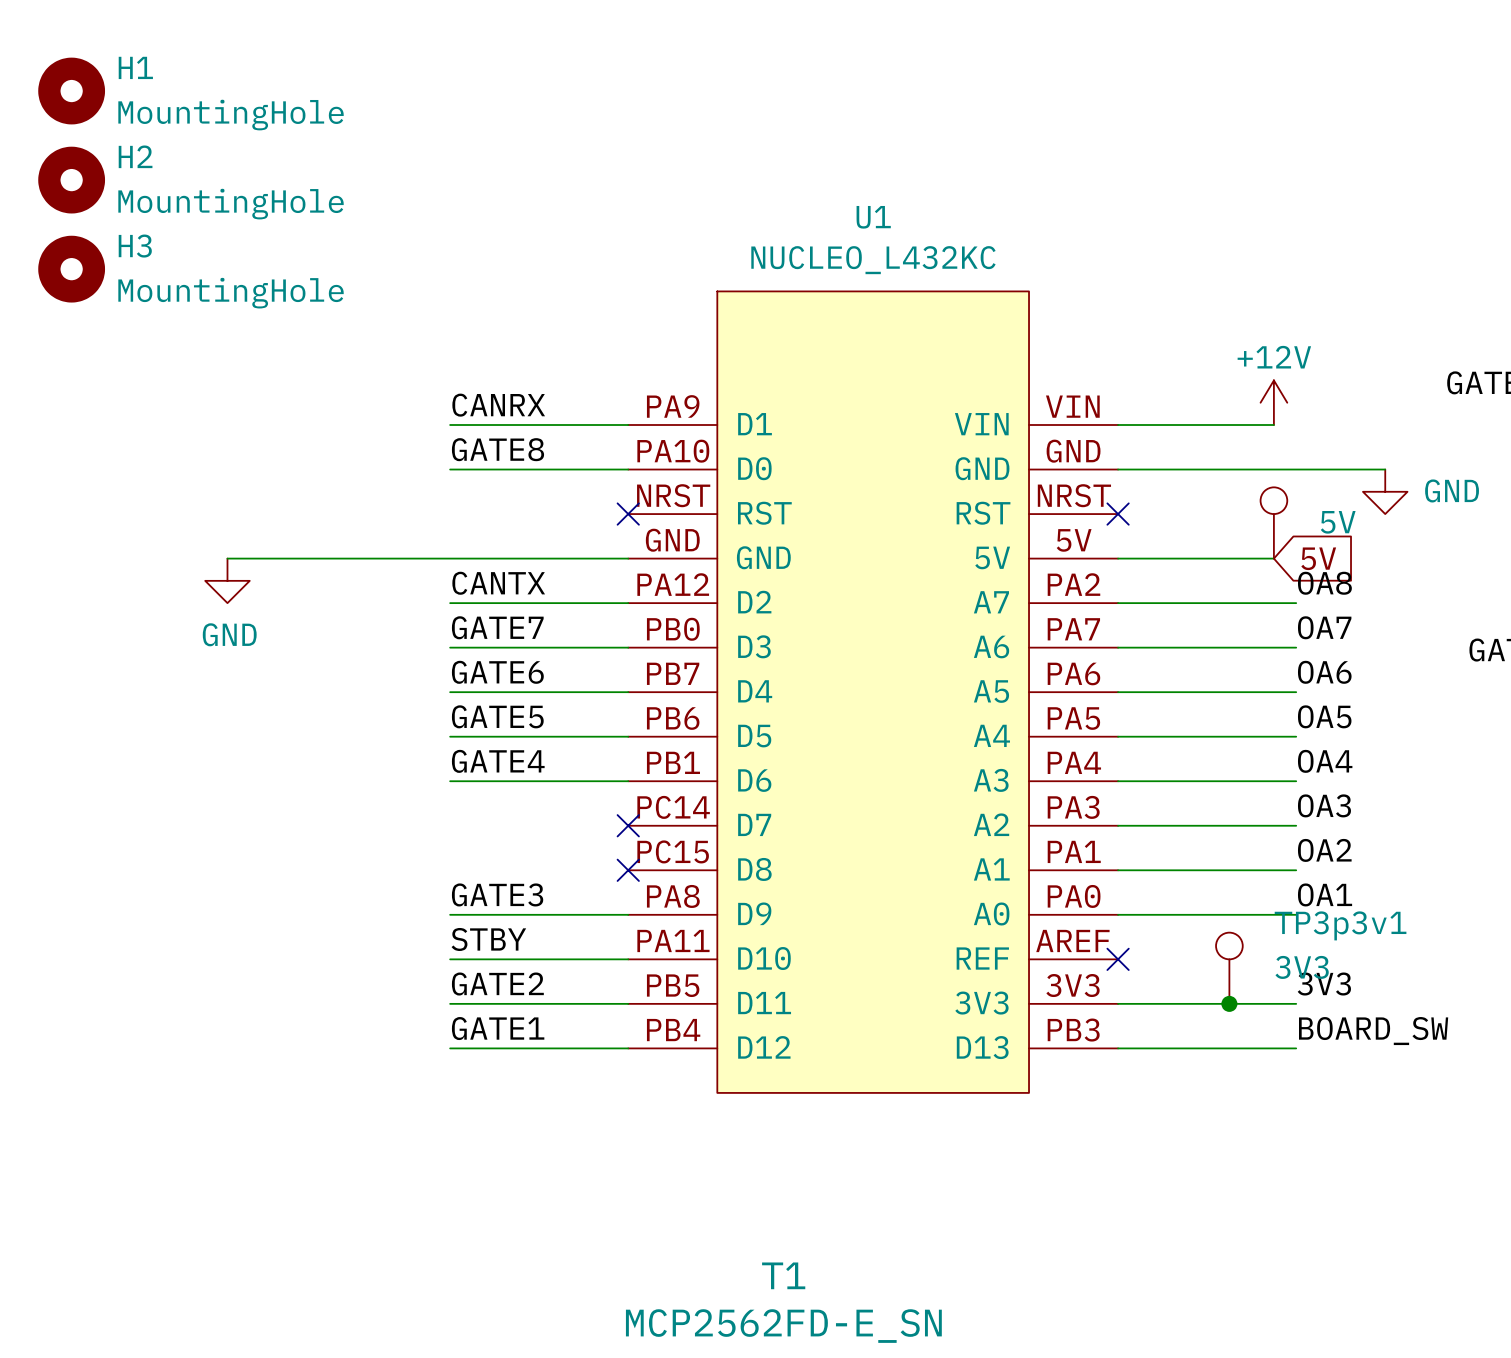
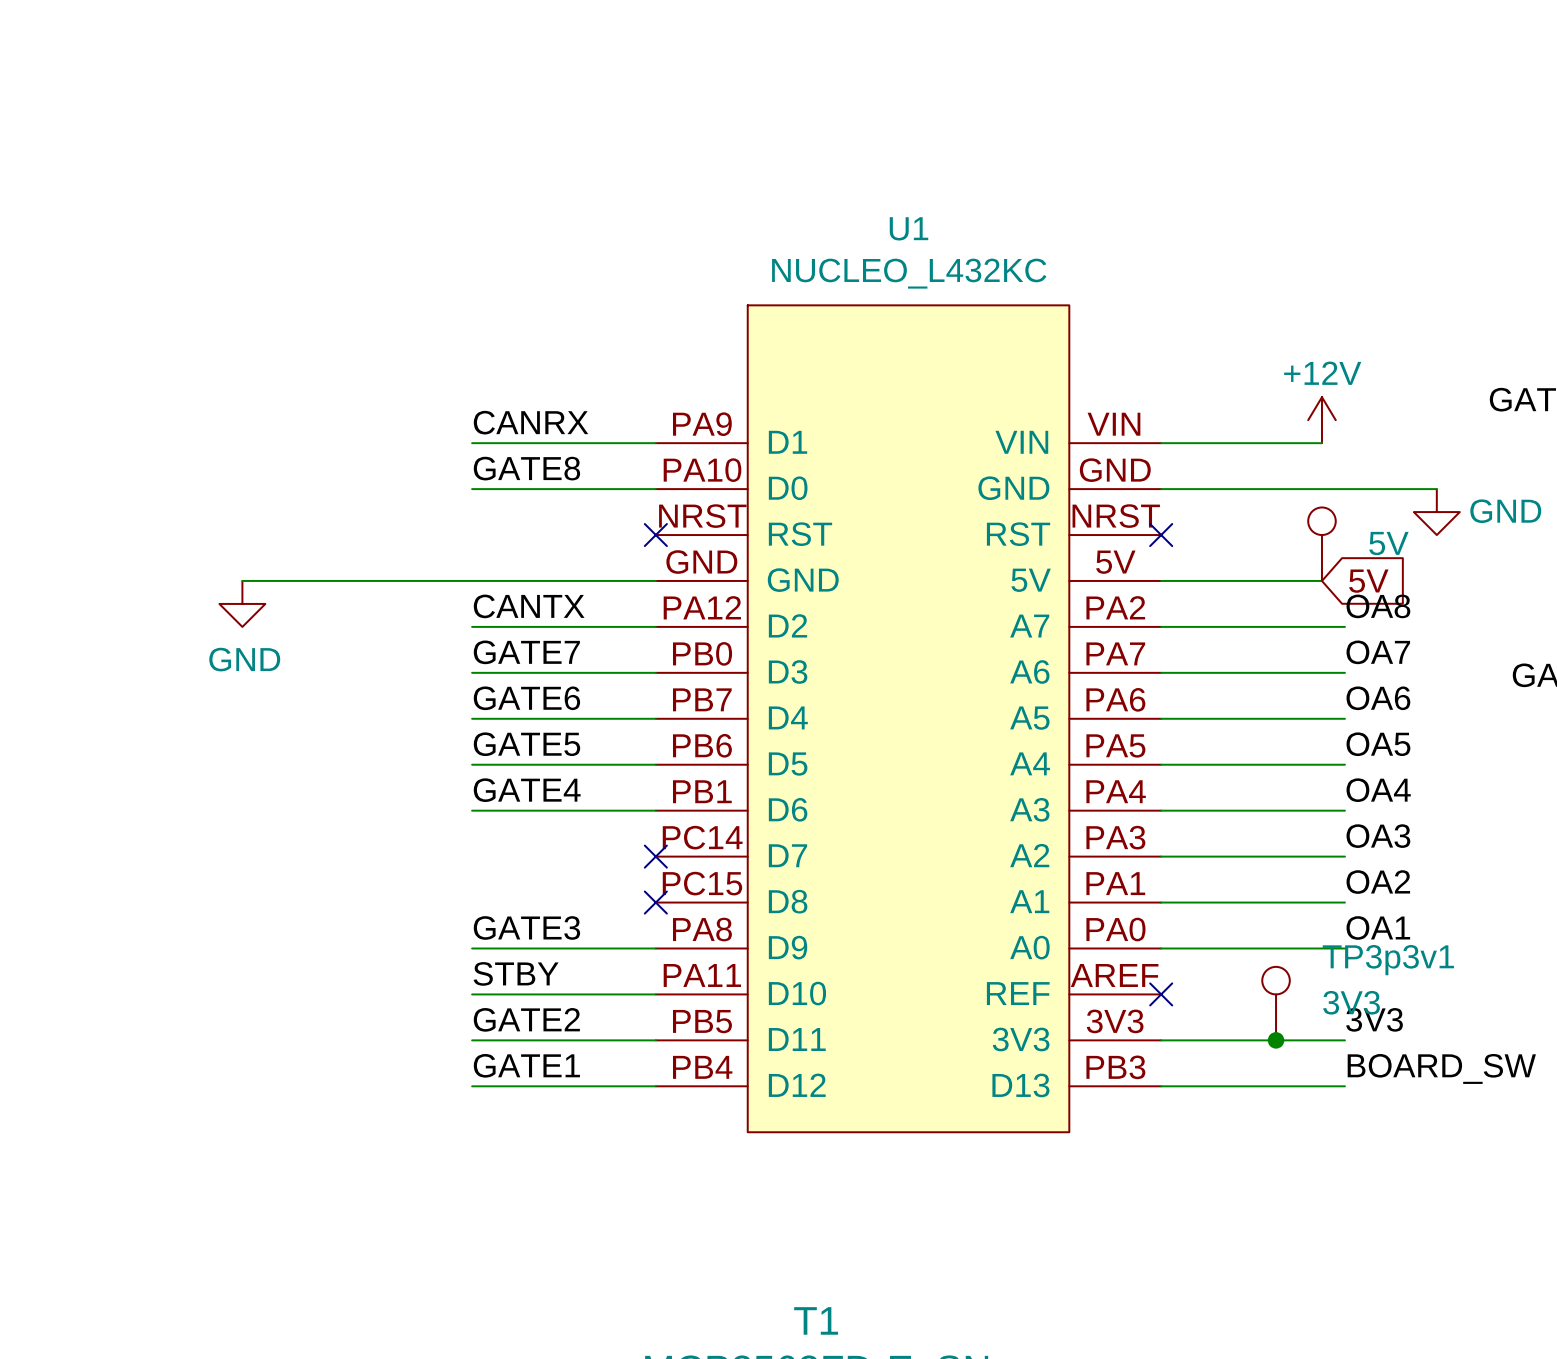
H1: MountingHole (71, 91) -> none
H2: MountingHole (71, 180) -> none
H3: MountingHole (71, 269) -> none

